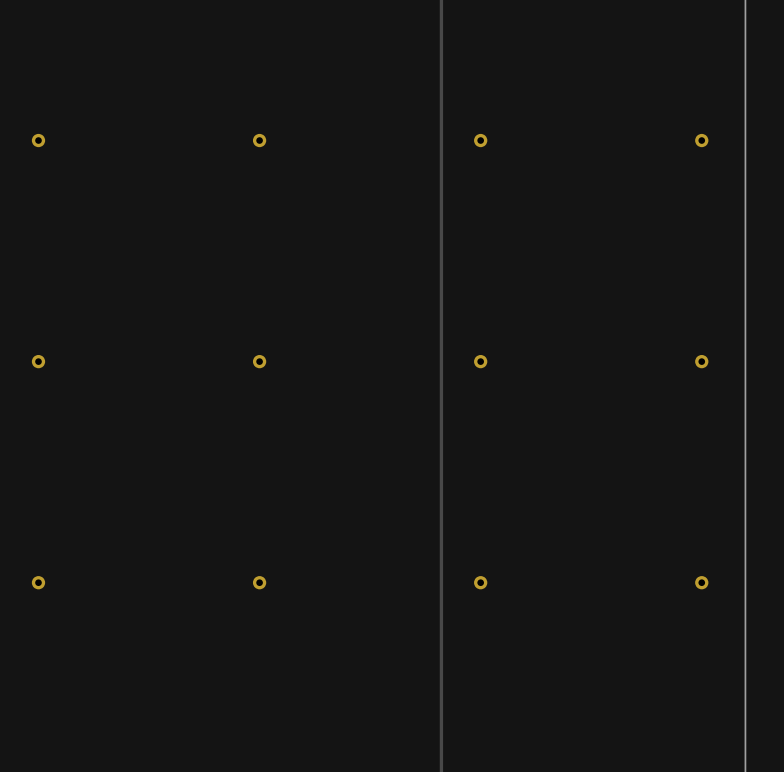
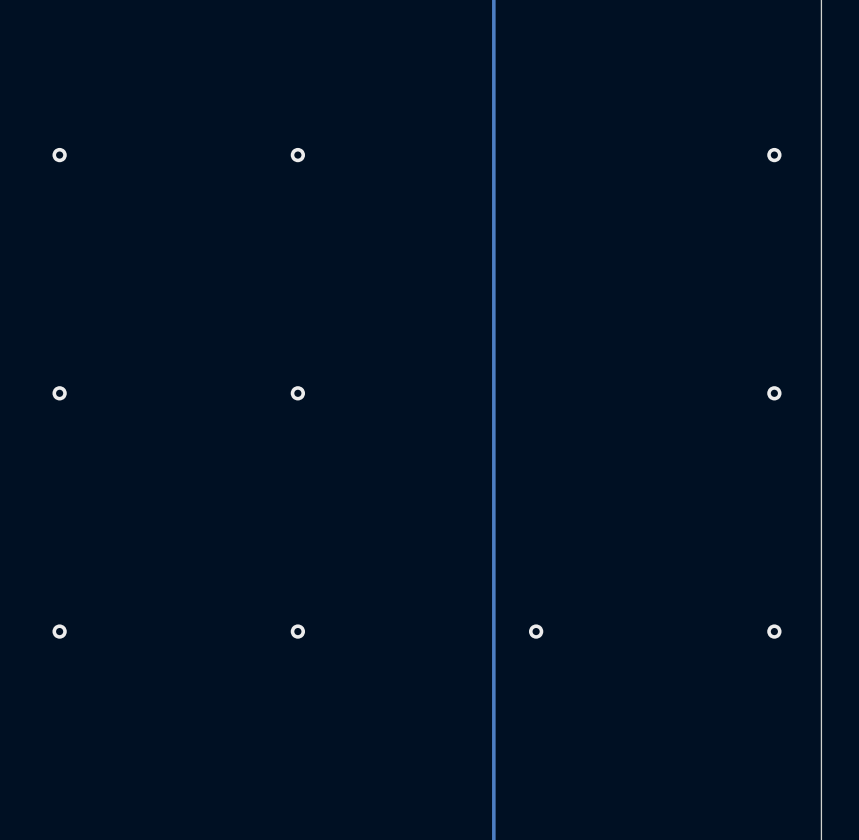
via: (480, 140) -> none
via: (480, 361) -> none

